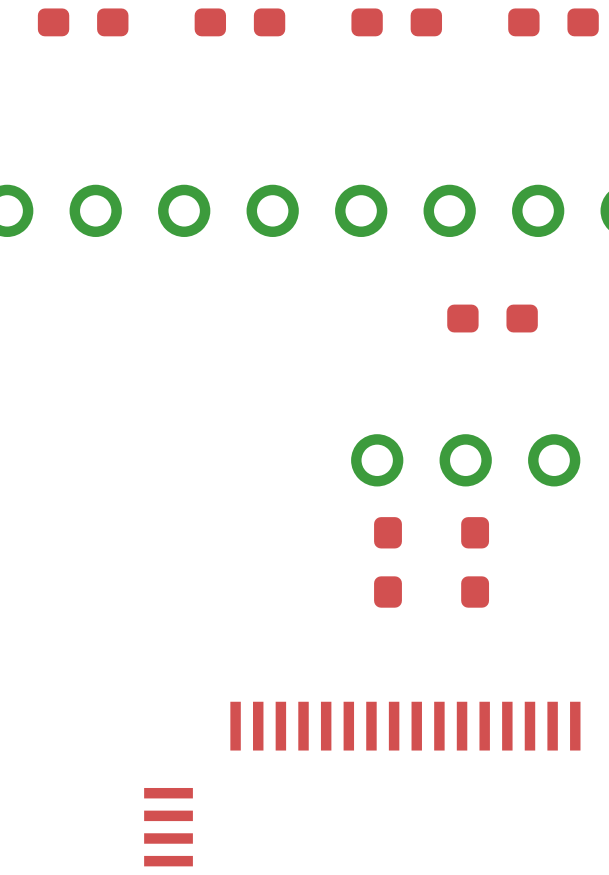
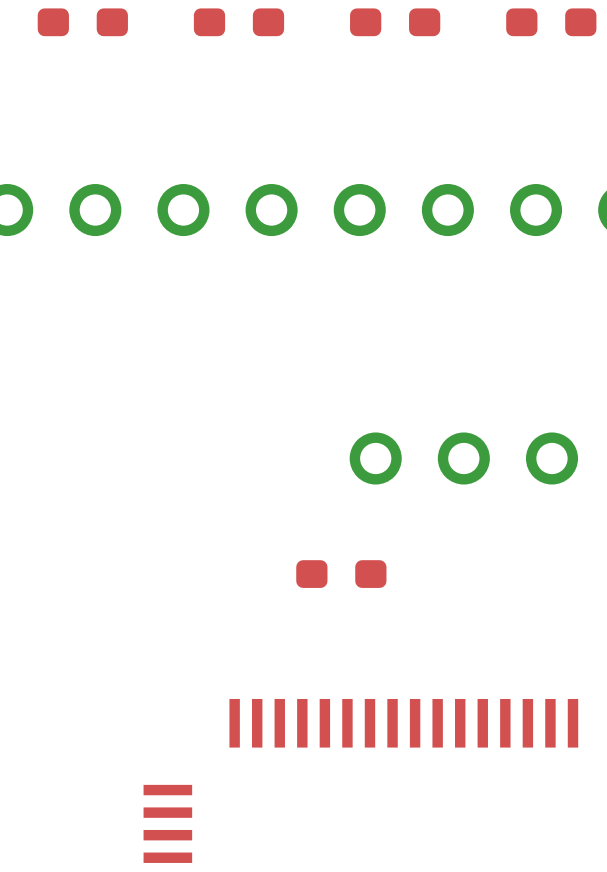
part: (492, 318) -> none
part rotation: 0° (388, 562) -> 90° clockwise (341, 574)
part: (475, 562) -> none

